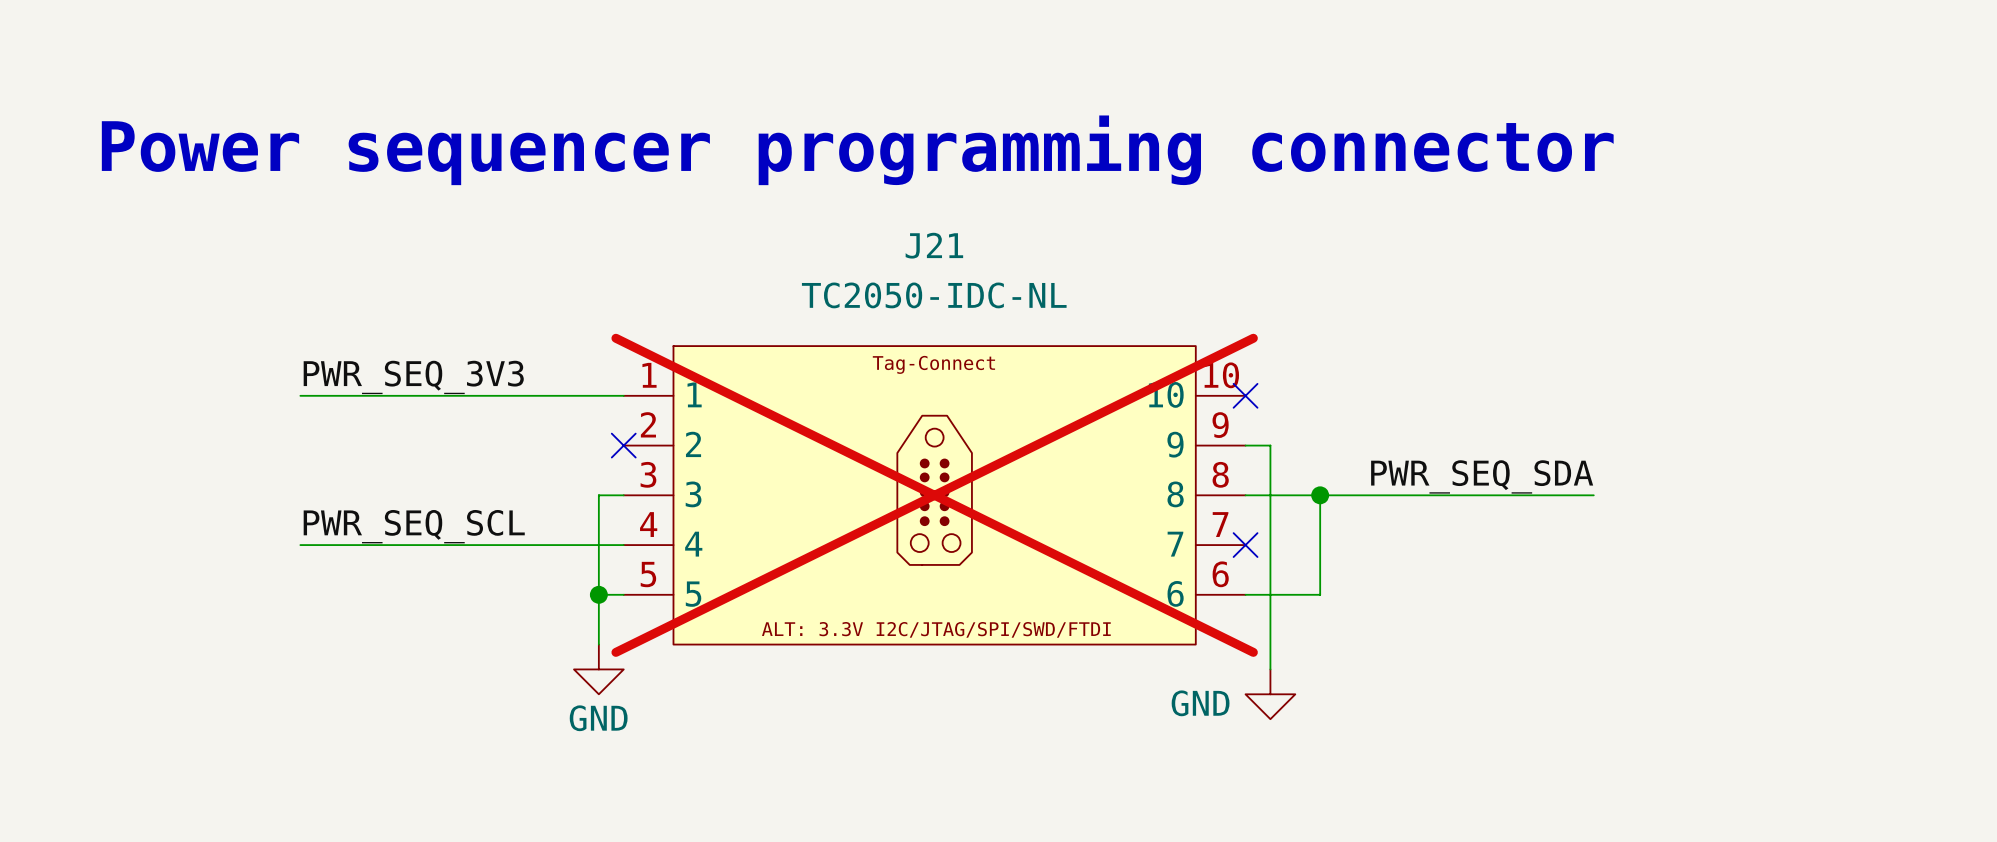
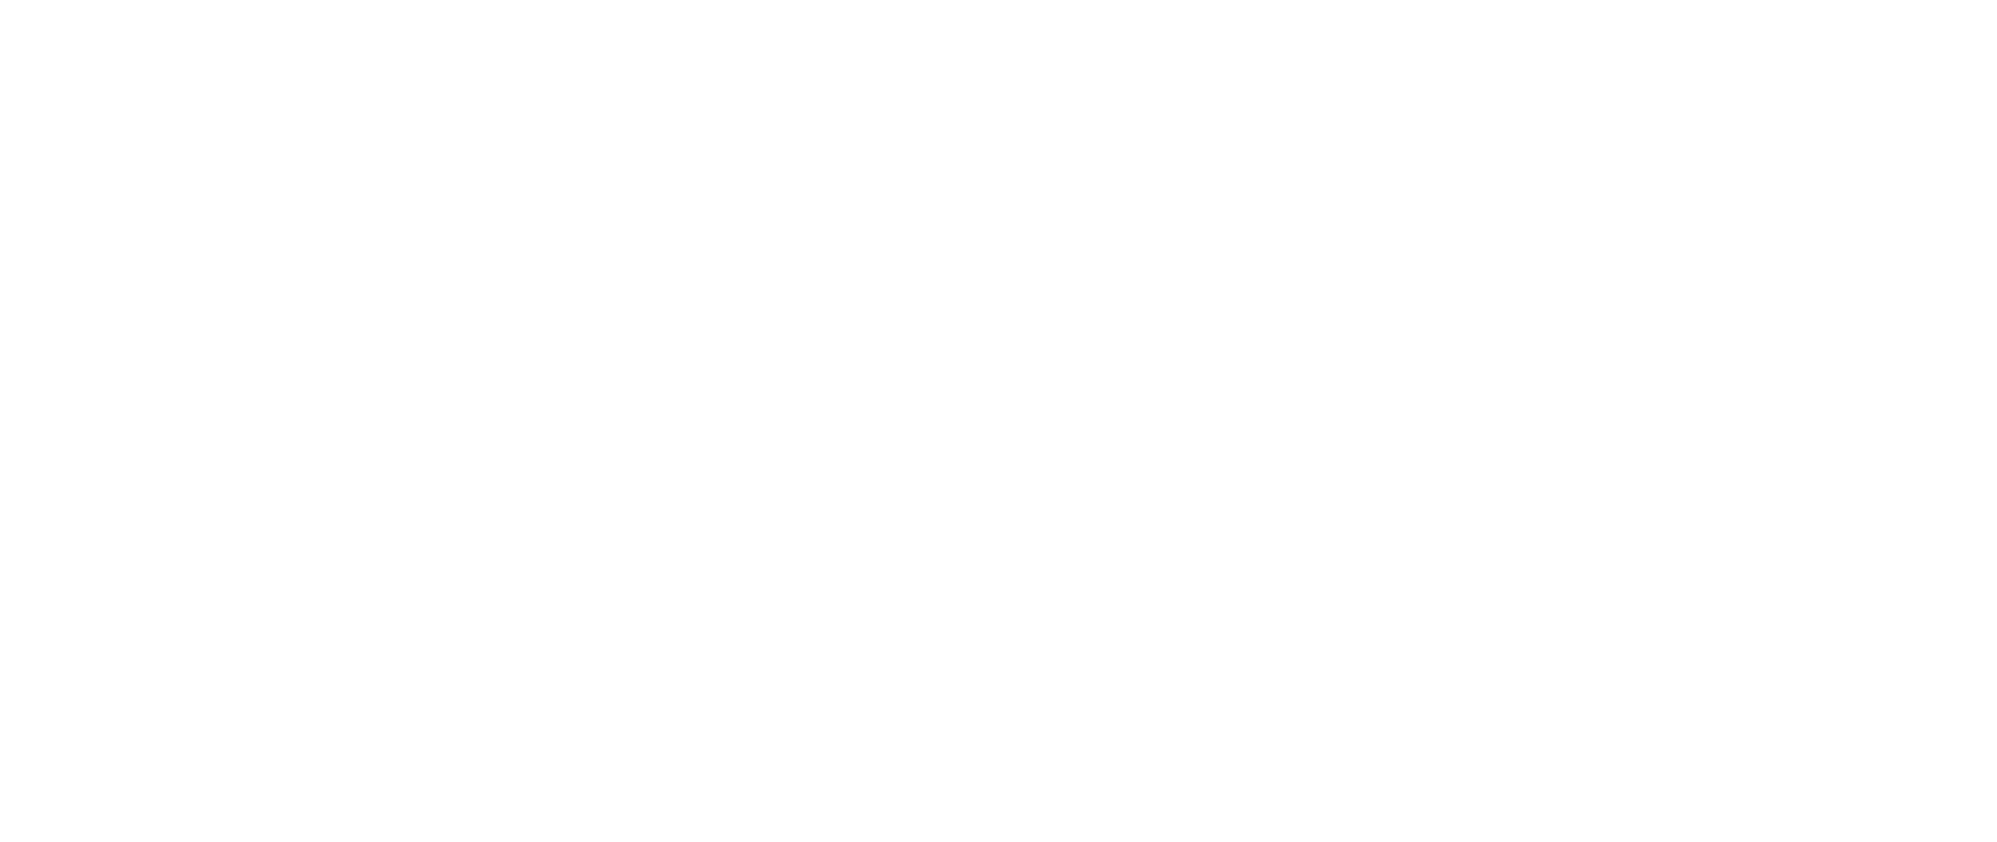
text: Power sequencer programming connector (857, 150) -> none
label: PWR_SEQ_3V3 (413, 377) -> none
wire: (300, 395) (623, 395) -> none
no-connect mark: (1245, 395) -> none
no-connect mark: (623, 445) -> none
wire: (1245, 445) (1270, 445) (1270, 669) -> none
label: PWR_SEQ_SDA (1482, 476) -> none
wire: (623, 495) (598, 495) (598, 644) -> none
J21: (934, 495) -> none
wire: (1245, 495) (1593, 495) -> none
wire: (1320, 495) (1320, 594) (1245, 594) -> none
junction: (1320, 495) -> none
label: PWR_SEQ_SCL (414, 526) -> none
wire: (300, 545) (623, 545) -> none
no-connect mark: (1245, 545) -> none
wire: (598, 594) (623, 594) -> none
junction: (598, 594) -> none
power symbol: GND (598, 669) -> none
power symbol: GND (1270, 694) -> none

